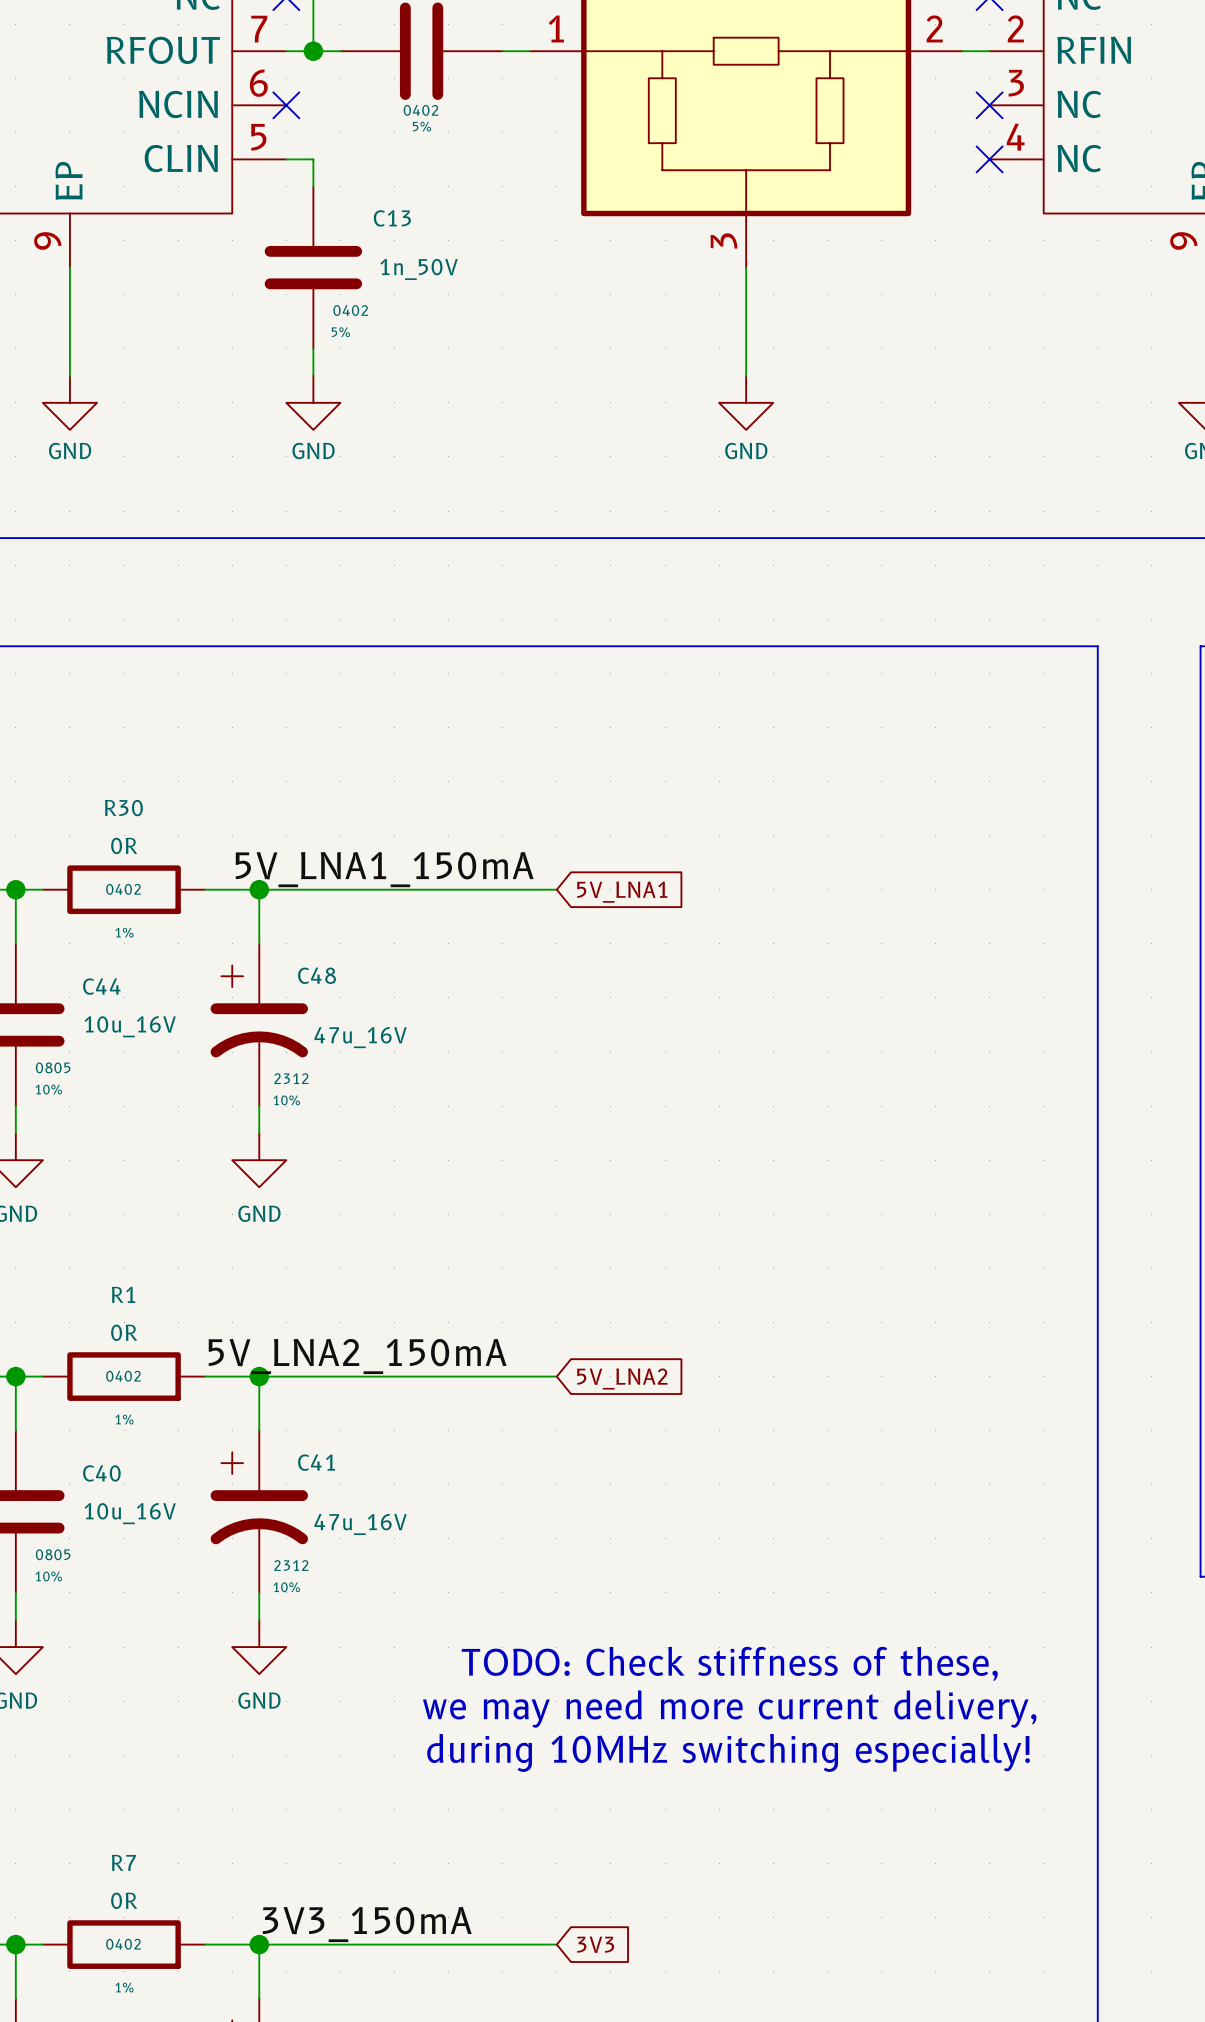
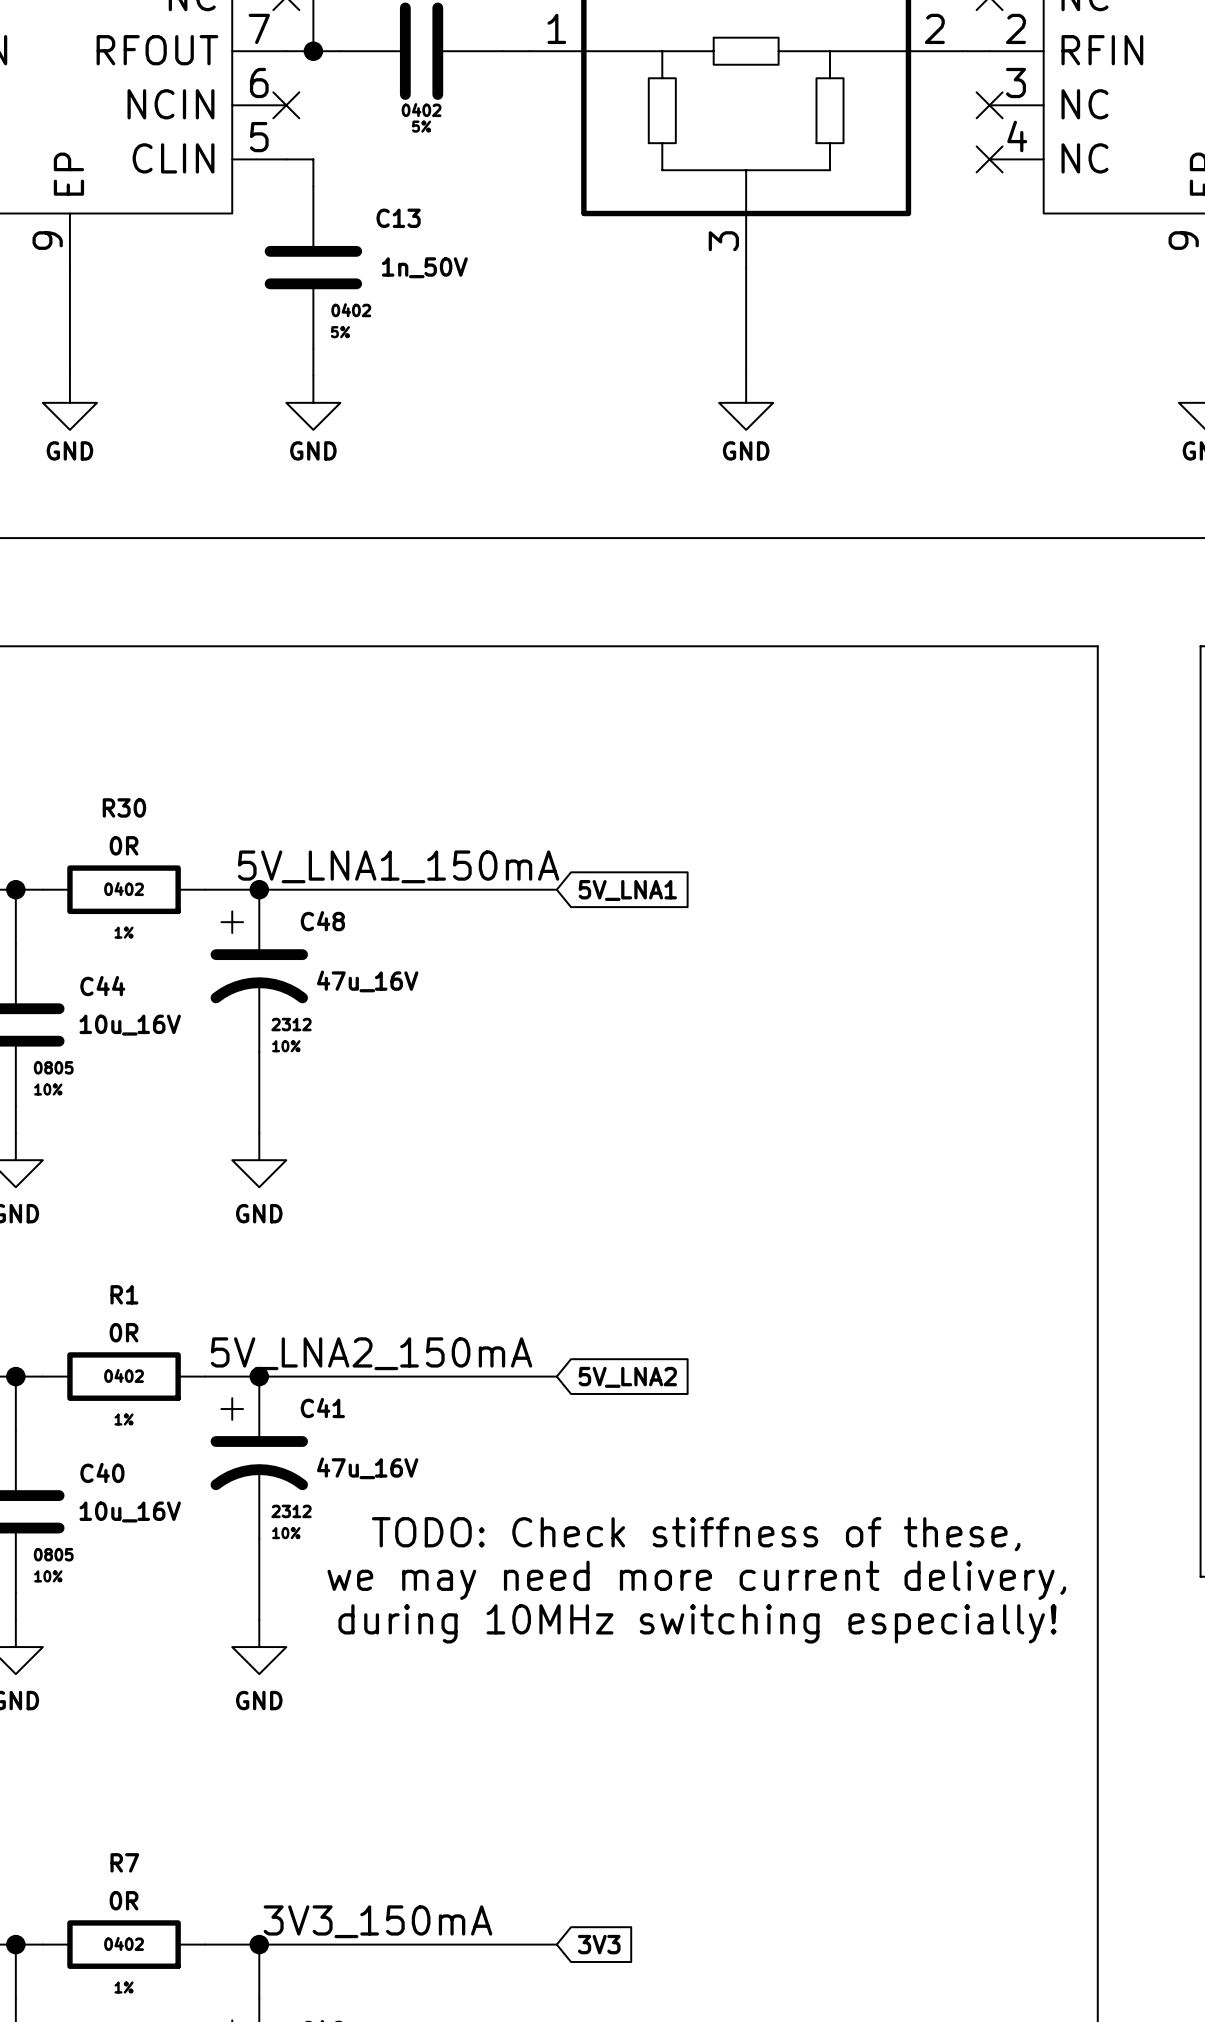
C48 position: (259, 1024) -> (259, 970)
C41 position: (259, 1511) -> (259, 1457)
text position: TODO: Check stiffness of these, (729, 1663) -> TODO: Check stiffness of these, (696, 1534)
text position: we may need more current delivery, (729, 1709) -> we may need more current delivery, (696, 1580)
text position: during 10MHz switching especially! (728, 1752) -> during 10MHz switching especially! (697, 1623)

